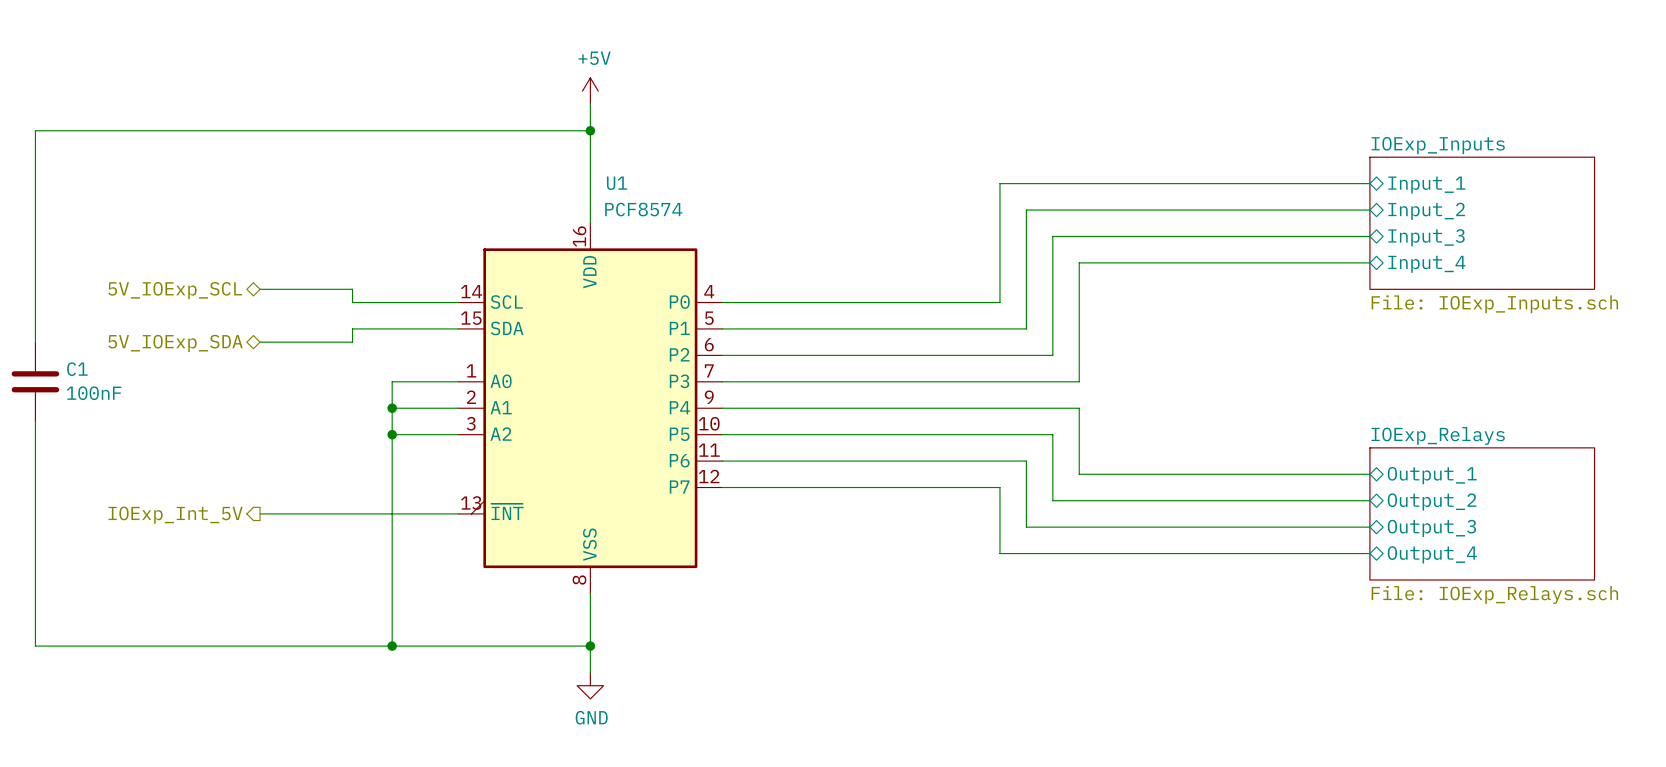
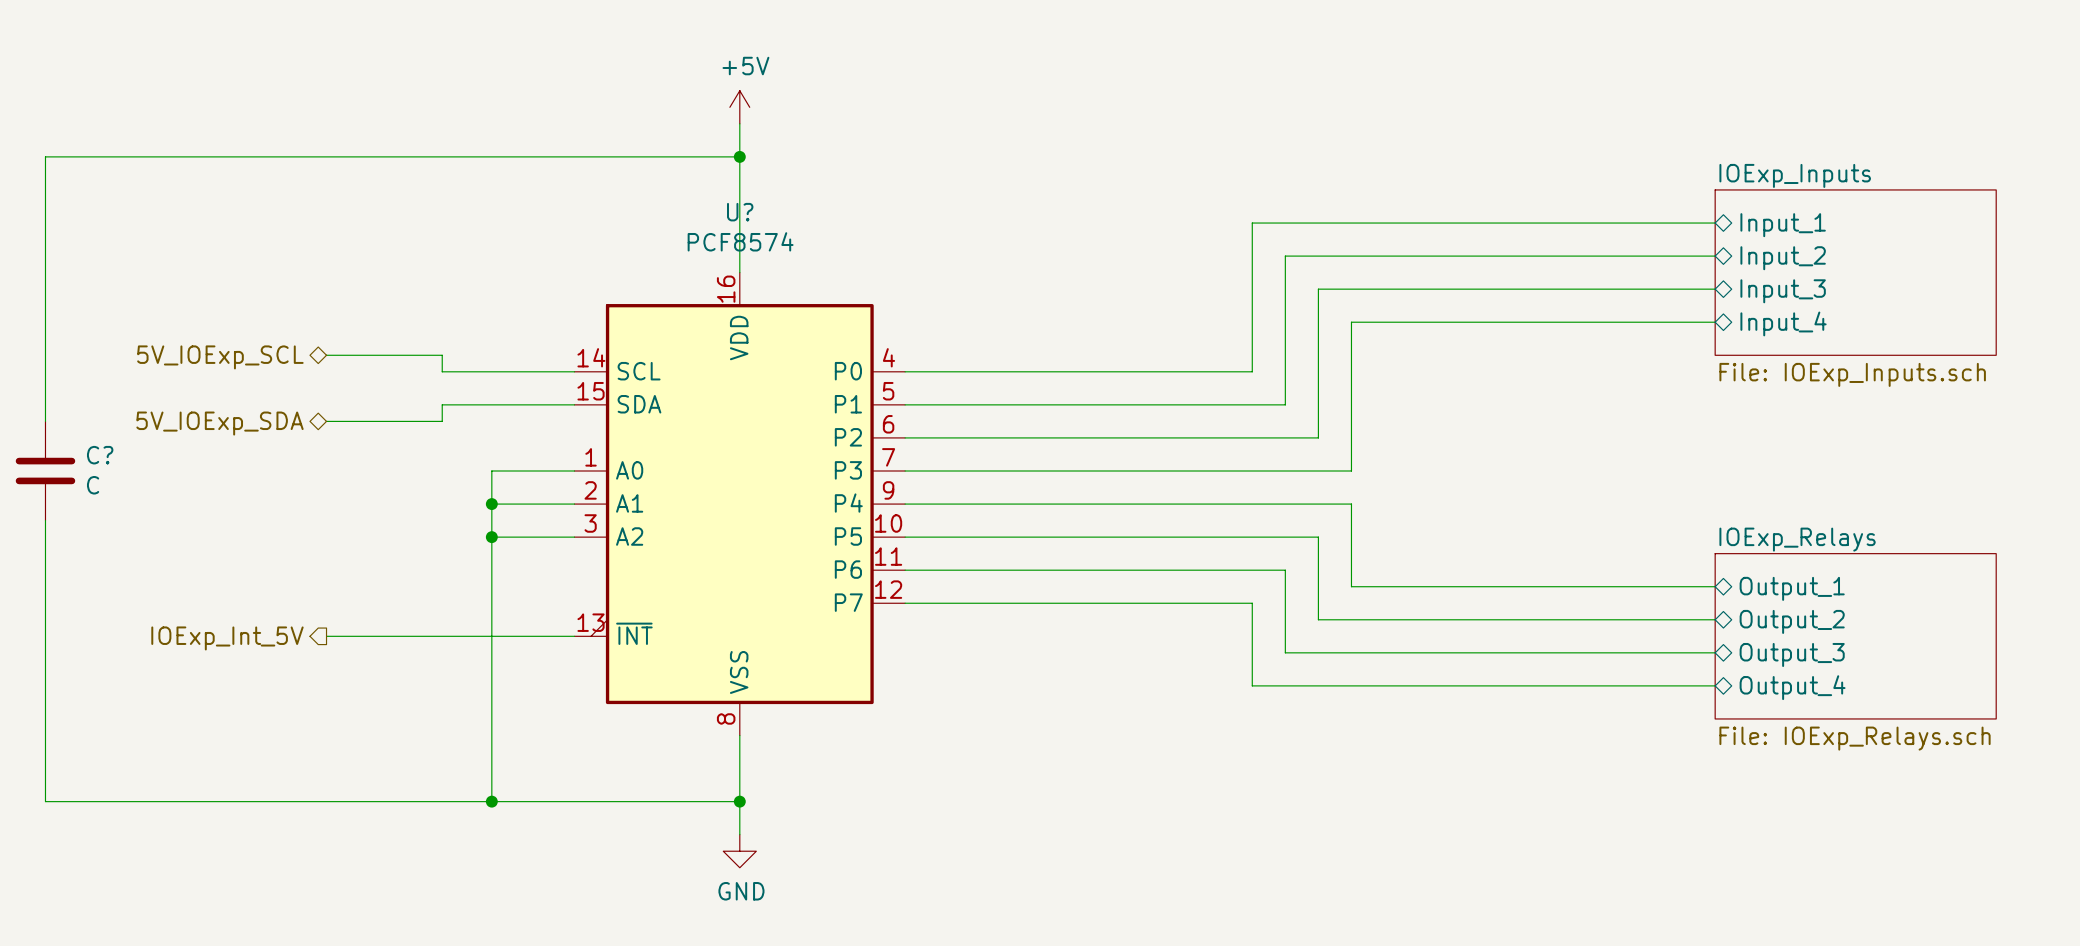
U1 name: U1 (617, 183) -> U? (740, 212)
U1 value position: PCF8574 (643, 209) -> PCF8574 (740, 241)
C1 name: C1 (77, 369) -> C? (100, 455)
C1 value: 100nF (94, 393) -> C (93, 485)

